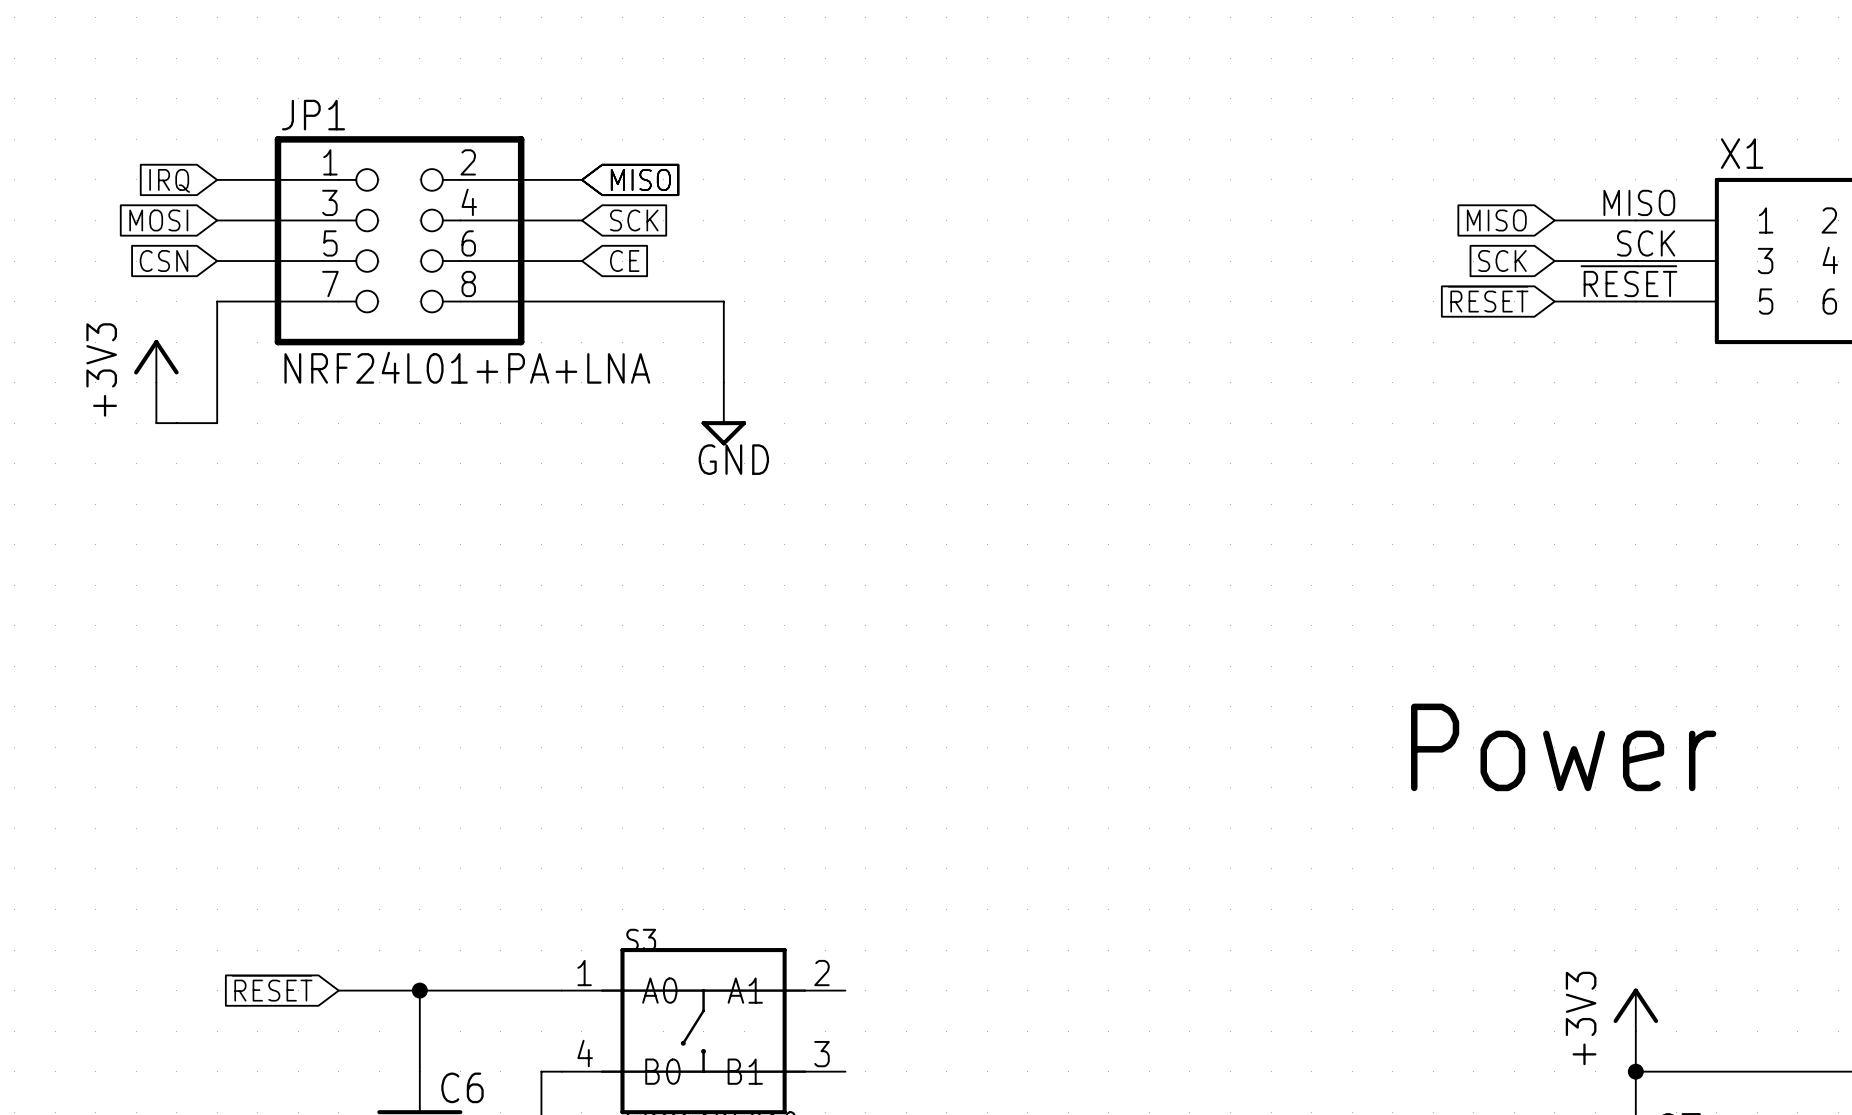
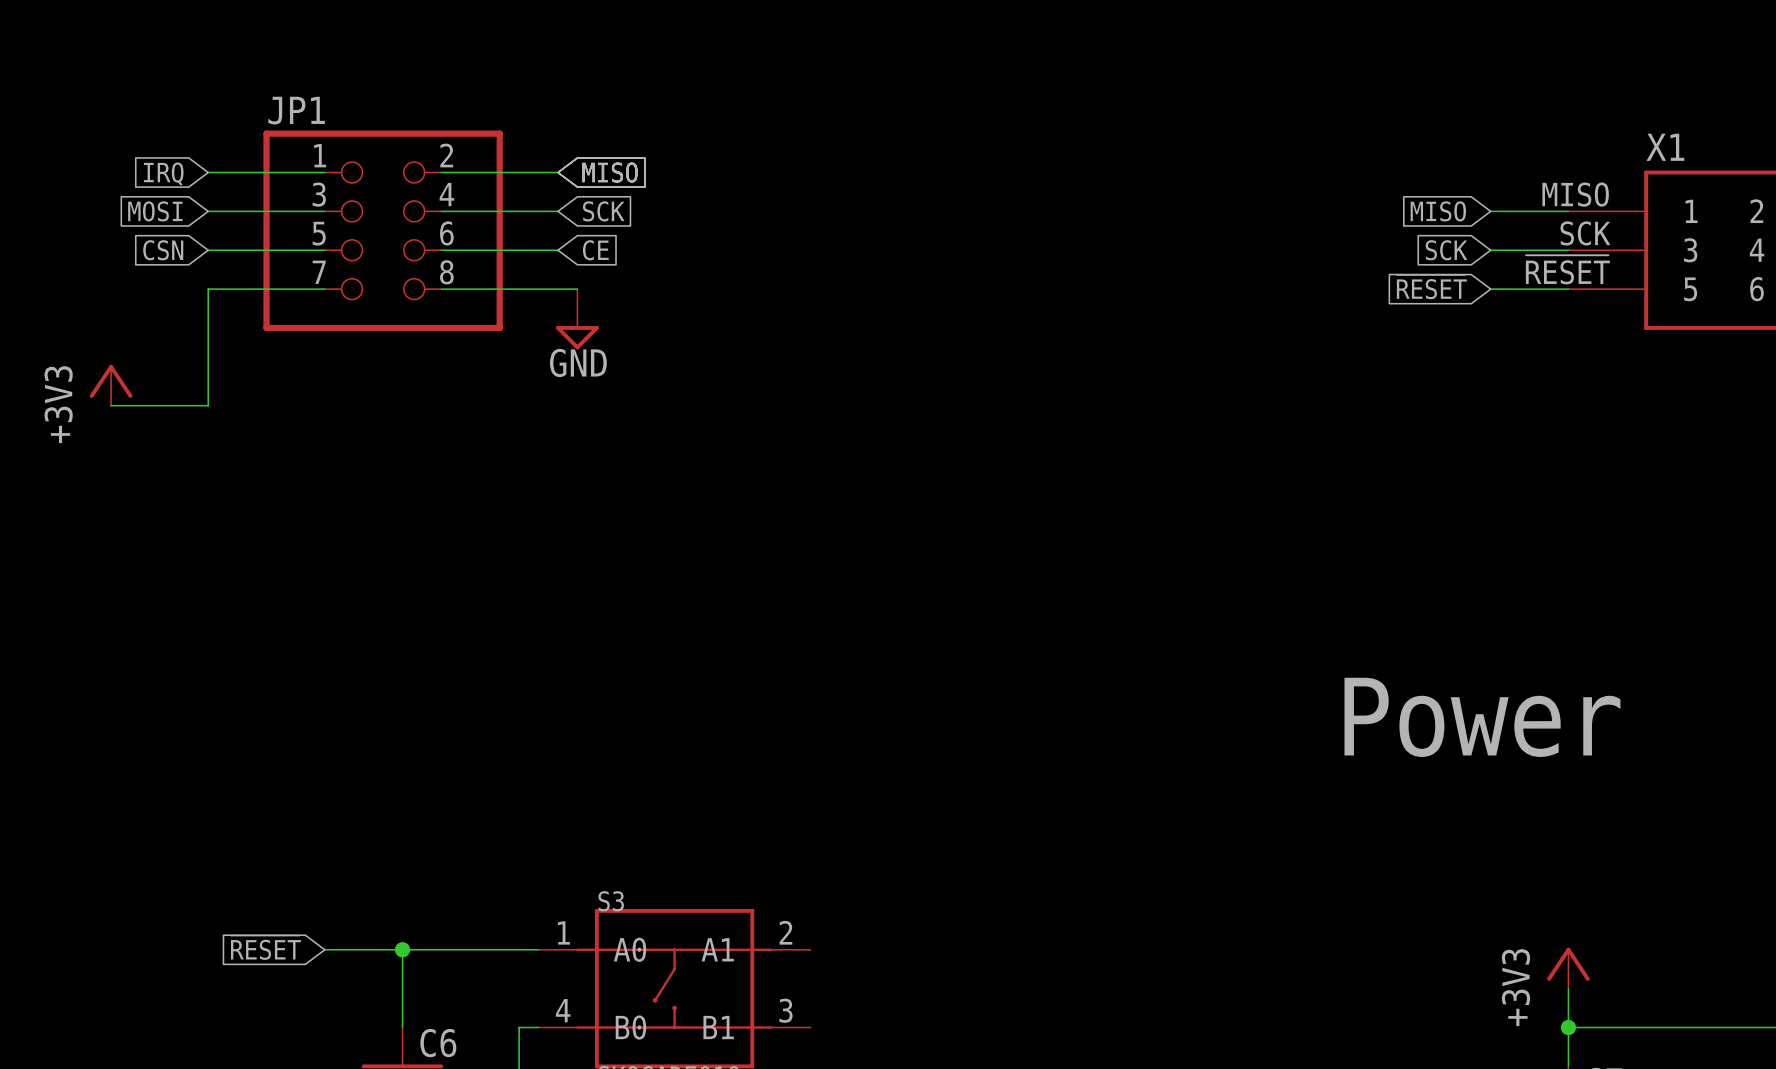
wire: (602, 301) (723, 301) (723, 382) -> none
power symbol position: +3V3 (156, 361) -> +3V3 (111, 385)
JP1 value: NRF24L01+PA+LNA (467, 367) -> none
wire: (156, 382) (156, 423) -> (111, 405) (149, 405)
power symbol position: GND (723, 414) -> GND (577, 319)

